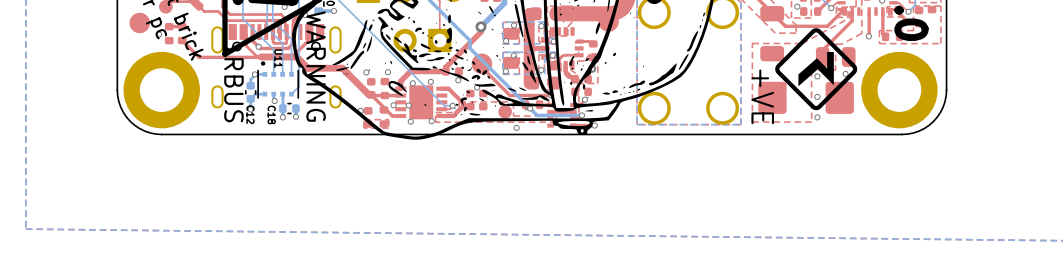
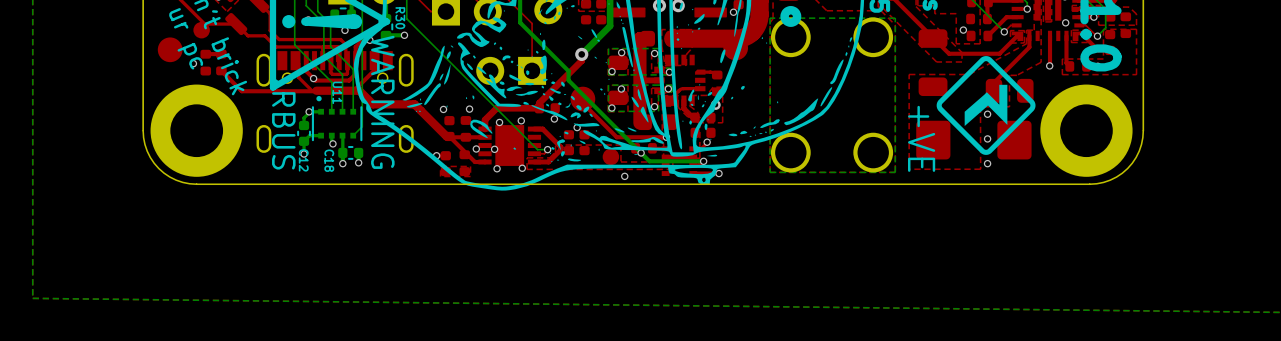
via: (845, 73) -> none

